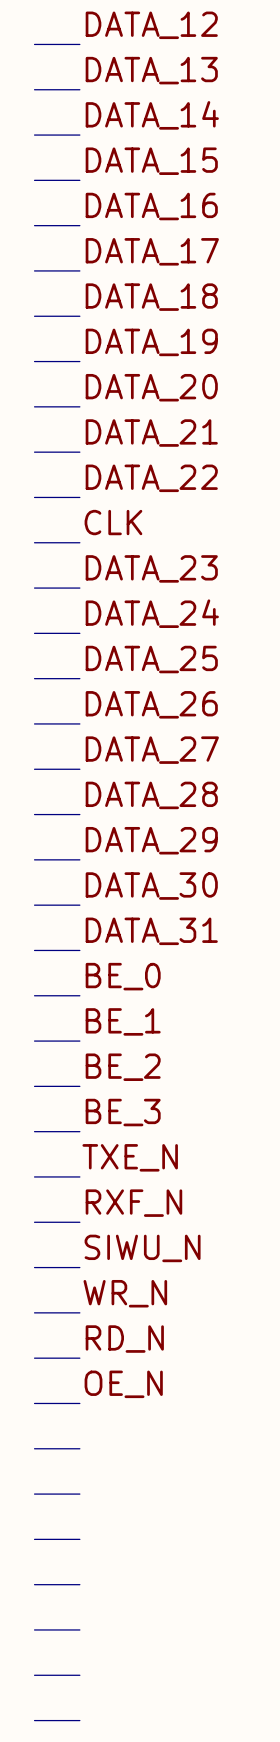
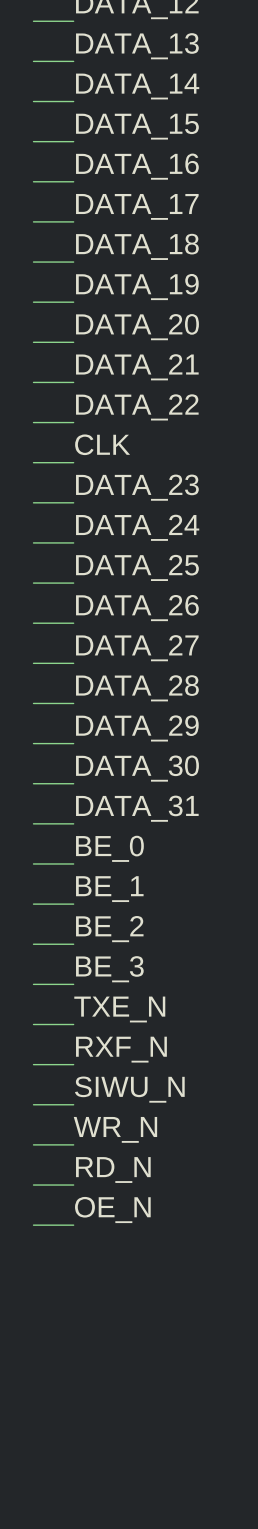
wire: (34, 1448) (79, 1448) -> none
wire: (34, 1494) (79, 1494) -> none
wire: (34, 1539) (79, 1539) -> none
wire: (34, 1584) (79, 1584) -> none
wire: (34, 1629) (79, 1629) -> none
wire: (34, 1675) (79, 1675) -> none
wire: (34, 1720) (79, 1720) -> none

